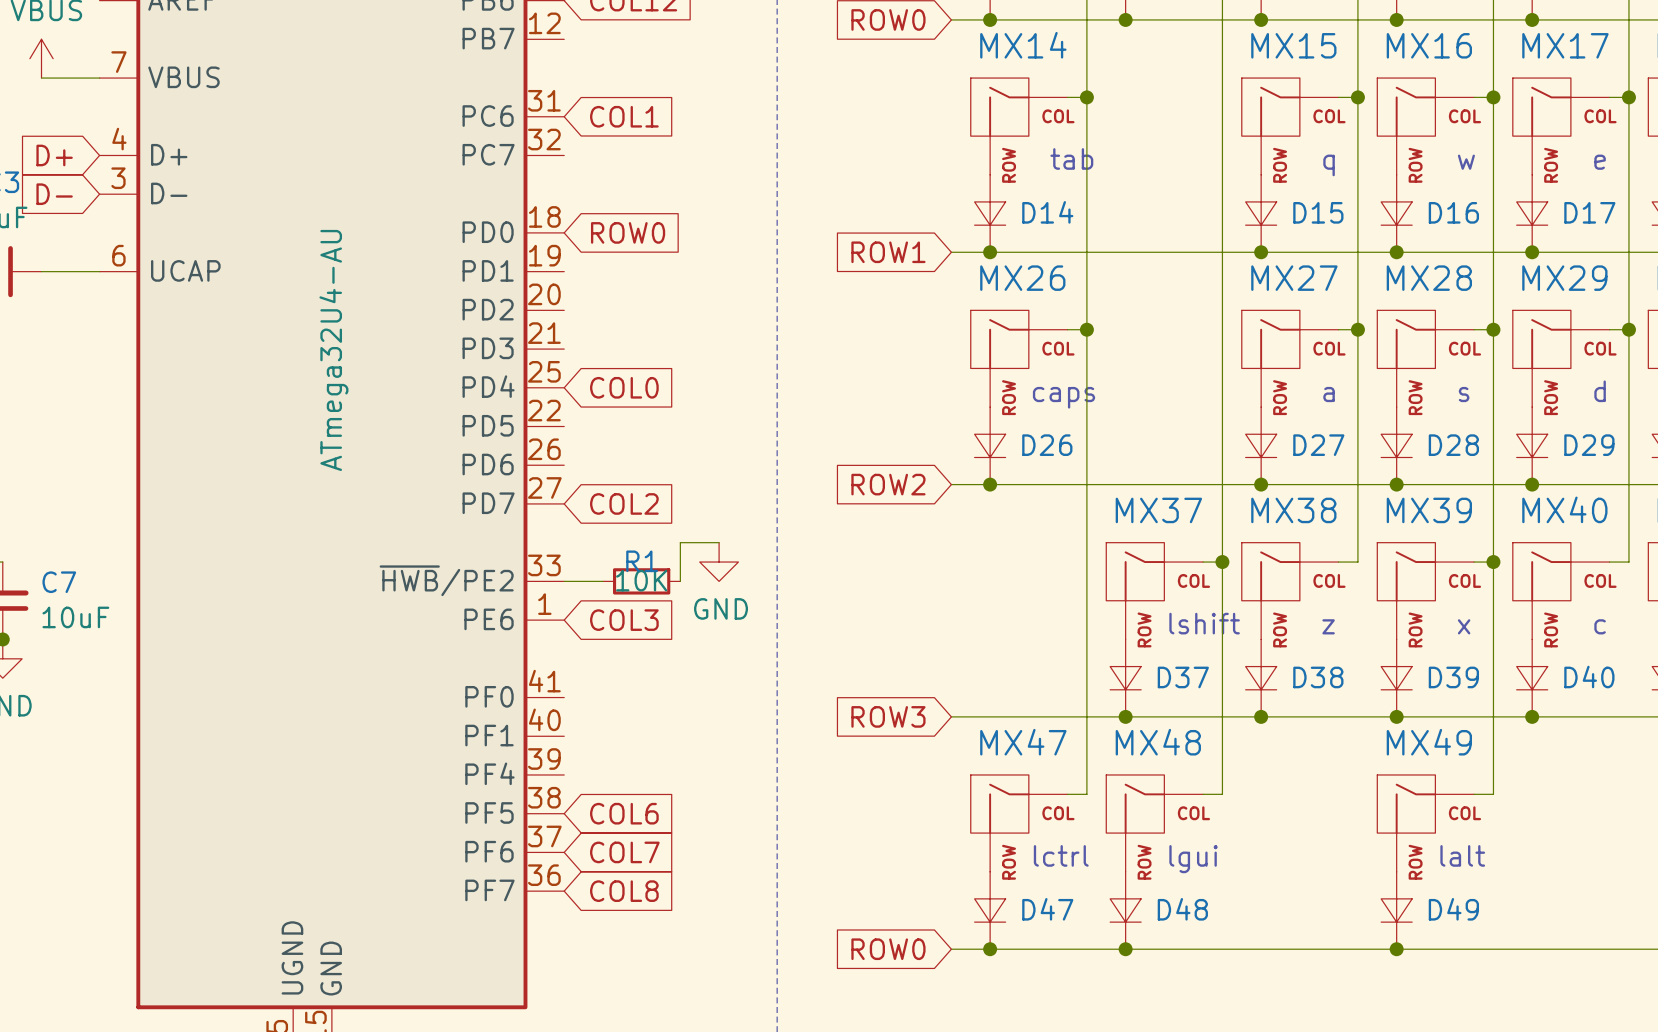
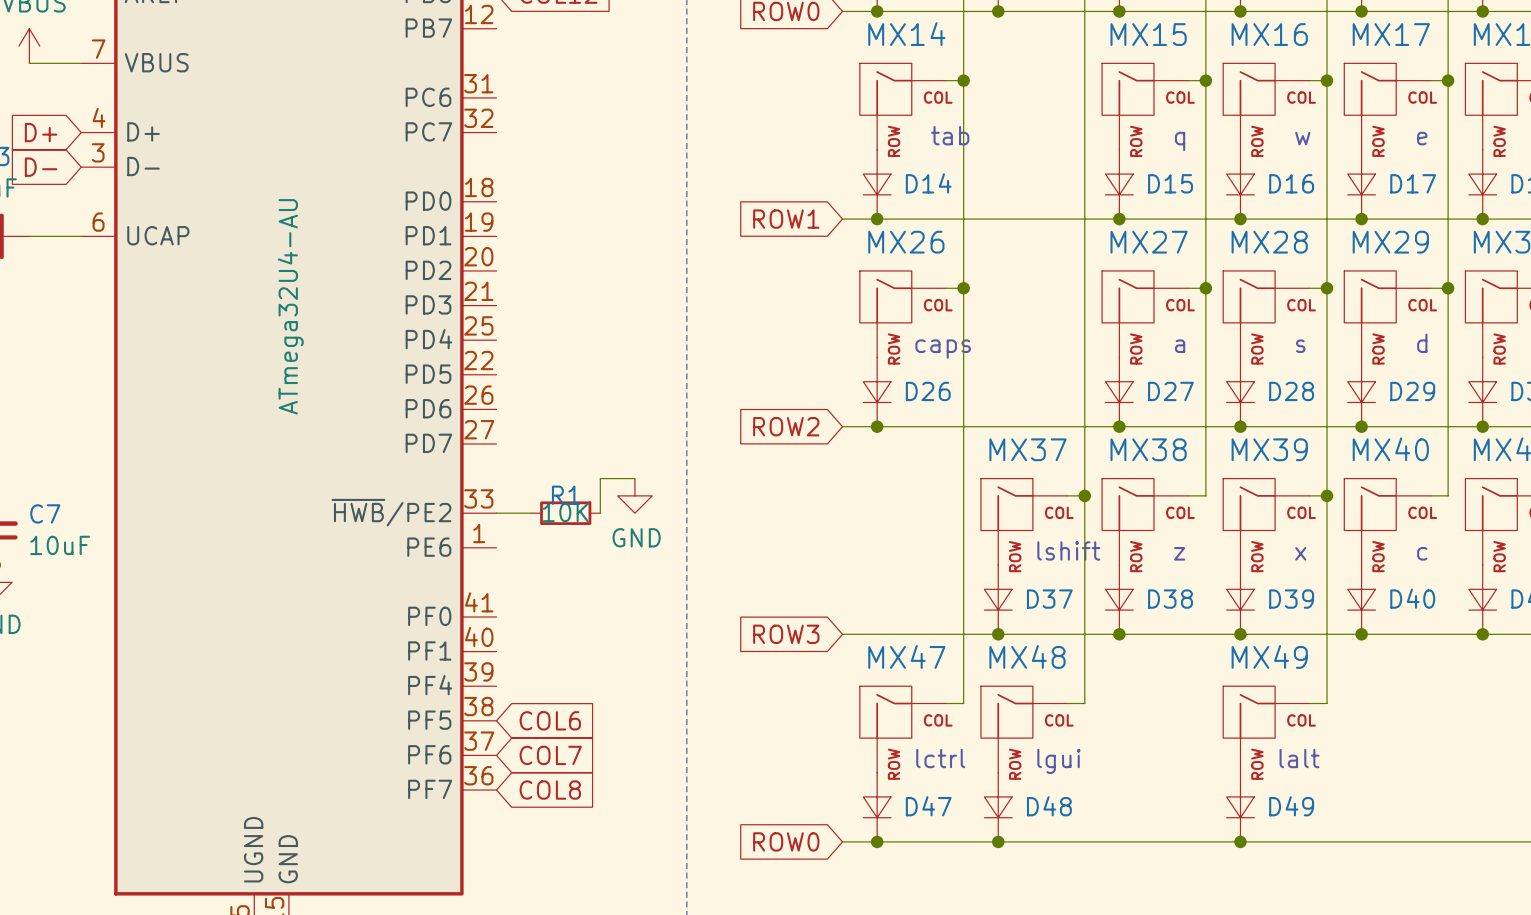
global label: COL1 (624, 116) -> none
global label: ROW0 (628, 232) -> none
global label: COL0 (624, 387) -> none
global label: COL2 (624, 503) -> none
global label: COL3 (624, 620) -> none

